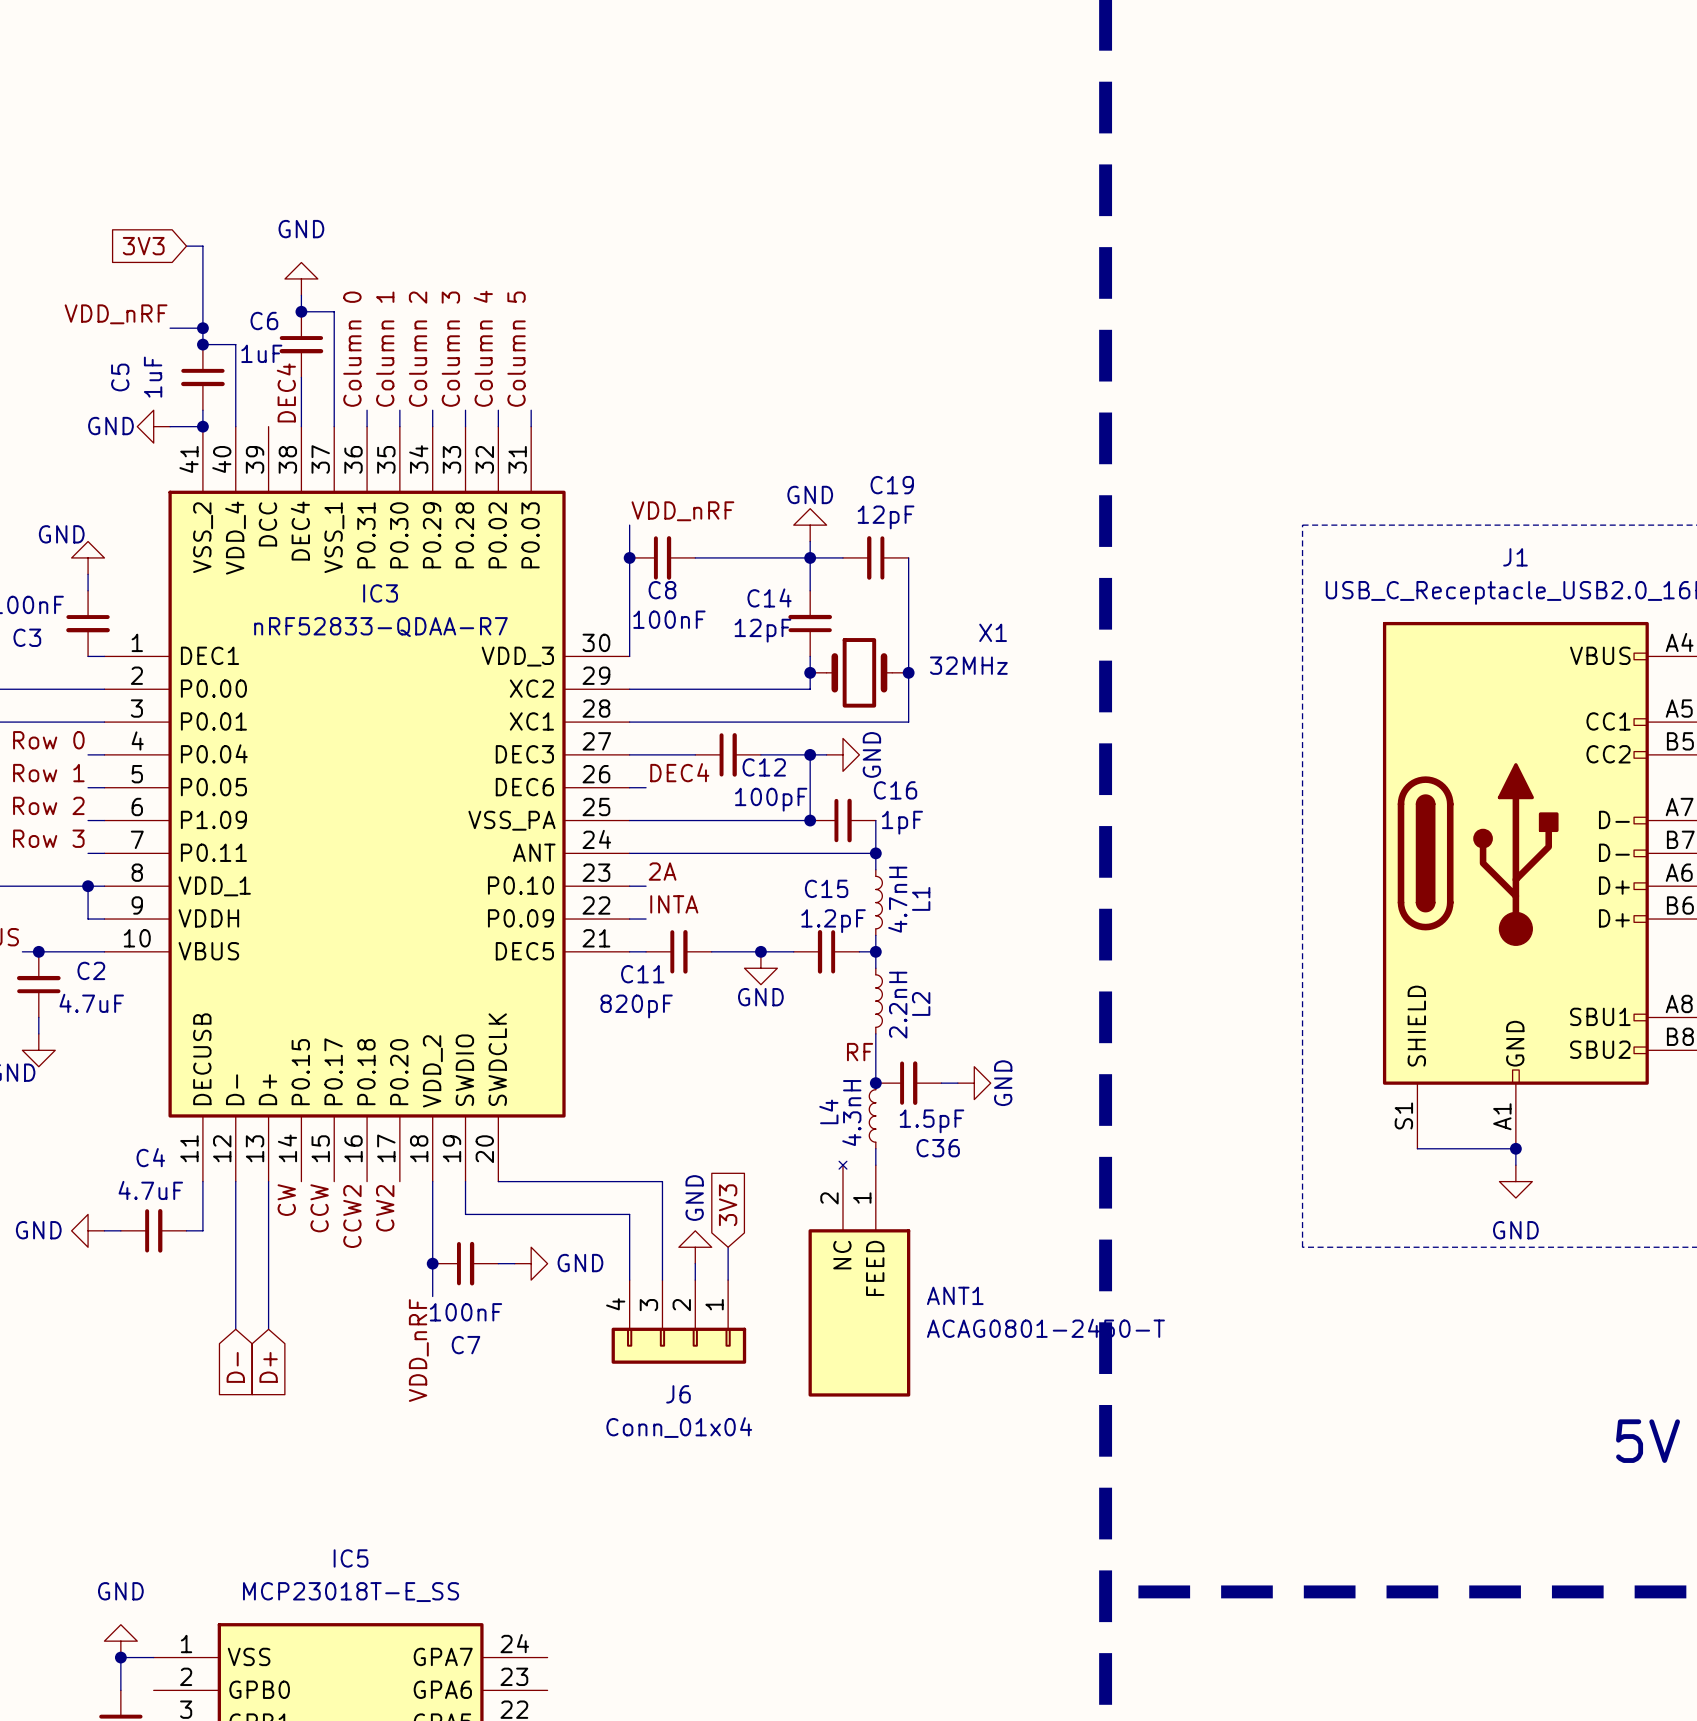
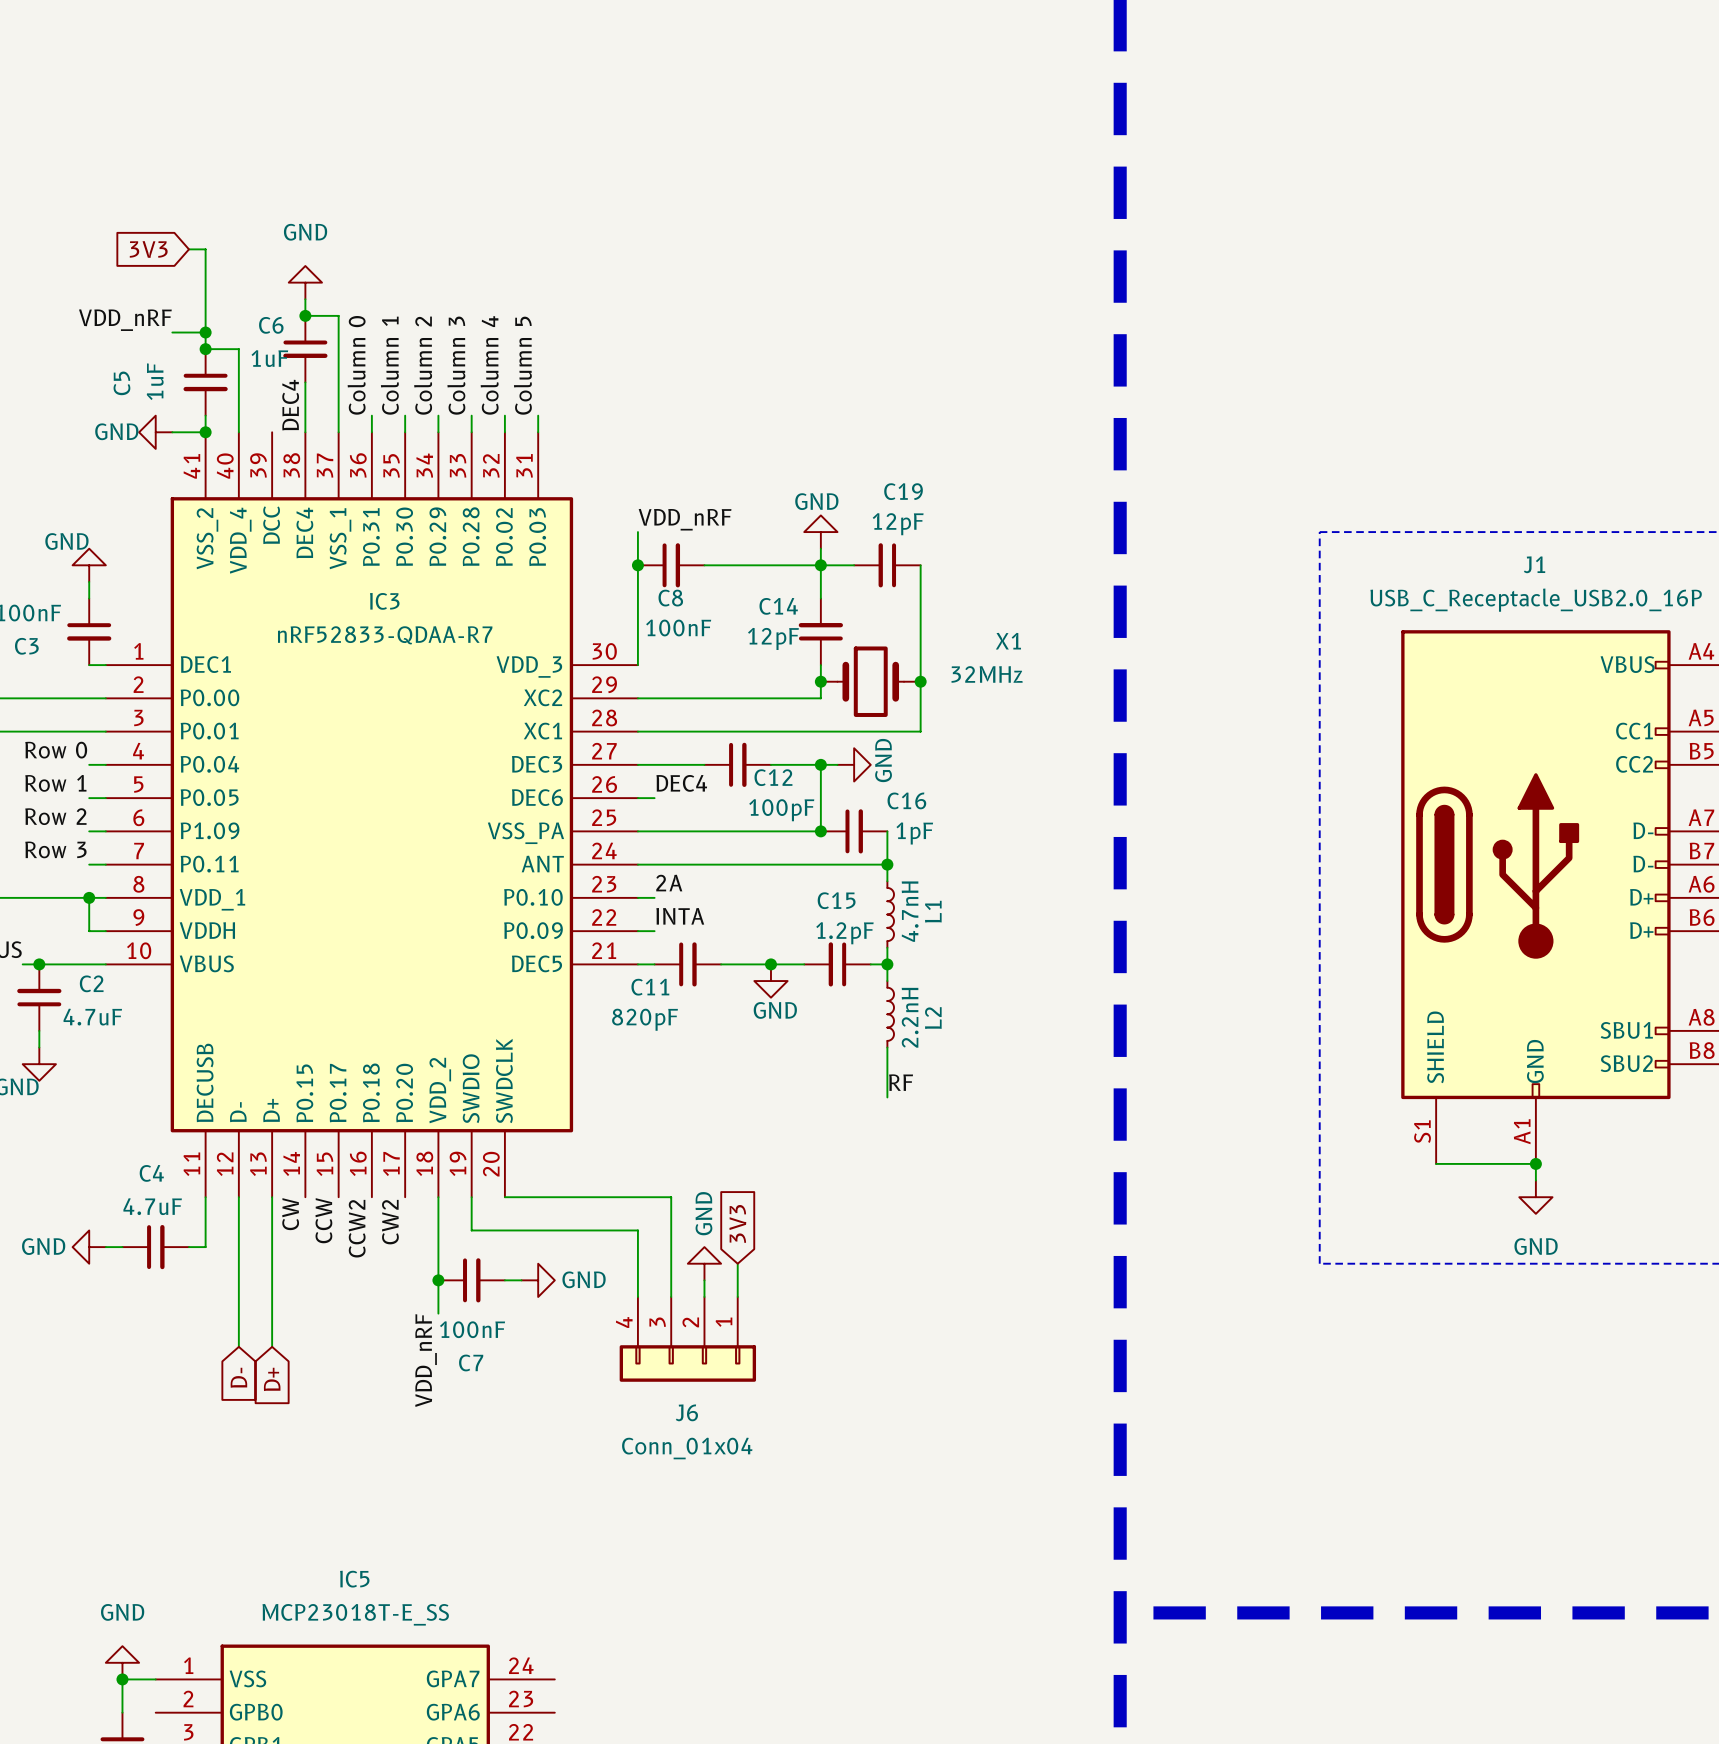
label position: RF (860, 1052) -> RF (901, 1082)
junction: (875, 1083) -> none
C36: 1.5pF (908, 1083) -> none
wire: (941, 1083) (957, 1083) -> none
power symbol: GND (974, 1083) -> none
L4: 4.3nH (872, 1115) -> none
wire: (875, 1148) (875, 1165) -> none
ANT1: ACAG0801-2450-T (859, 1278) -> none

